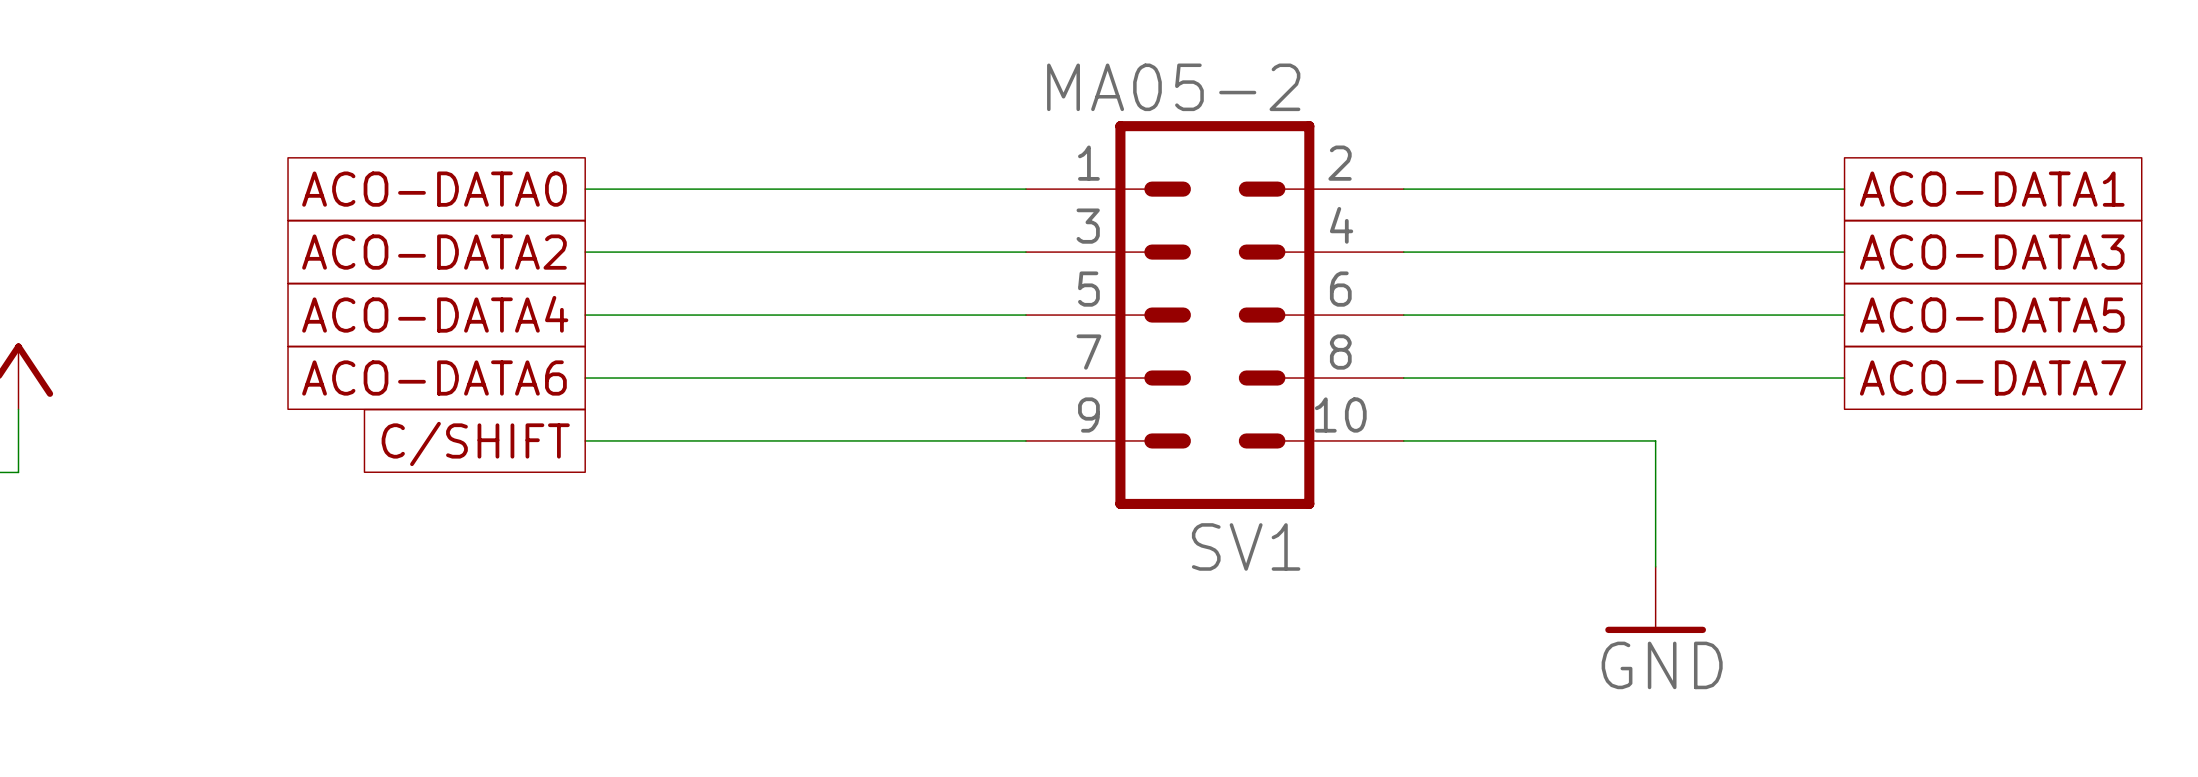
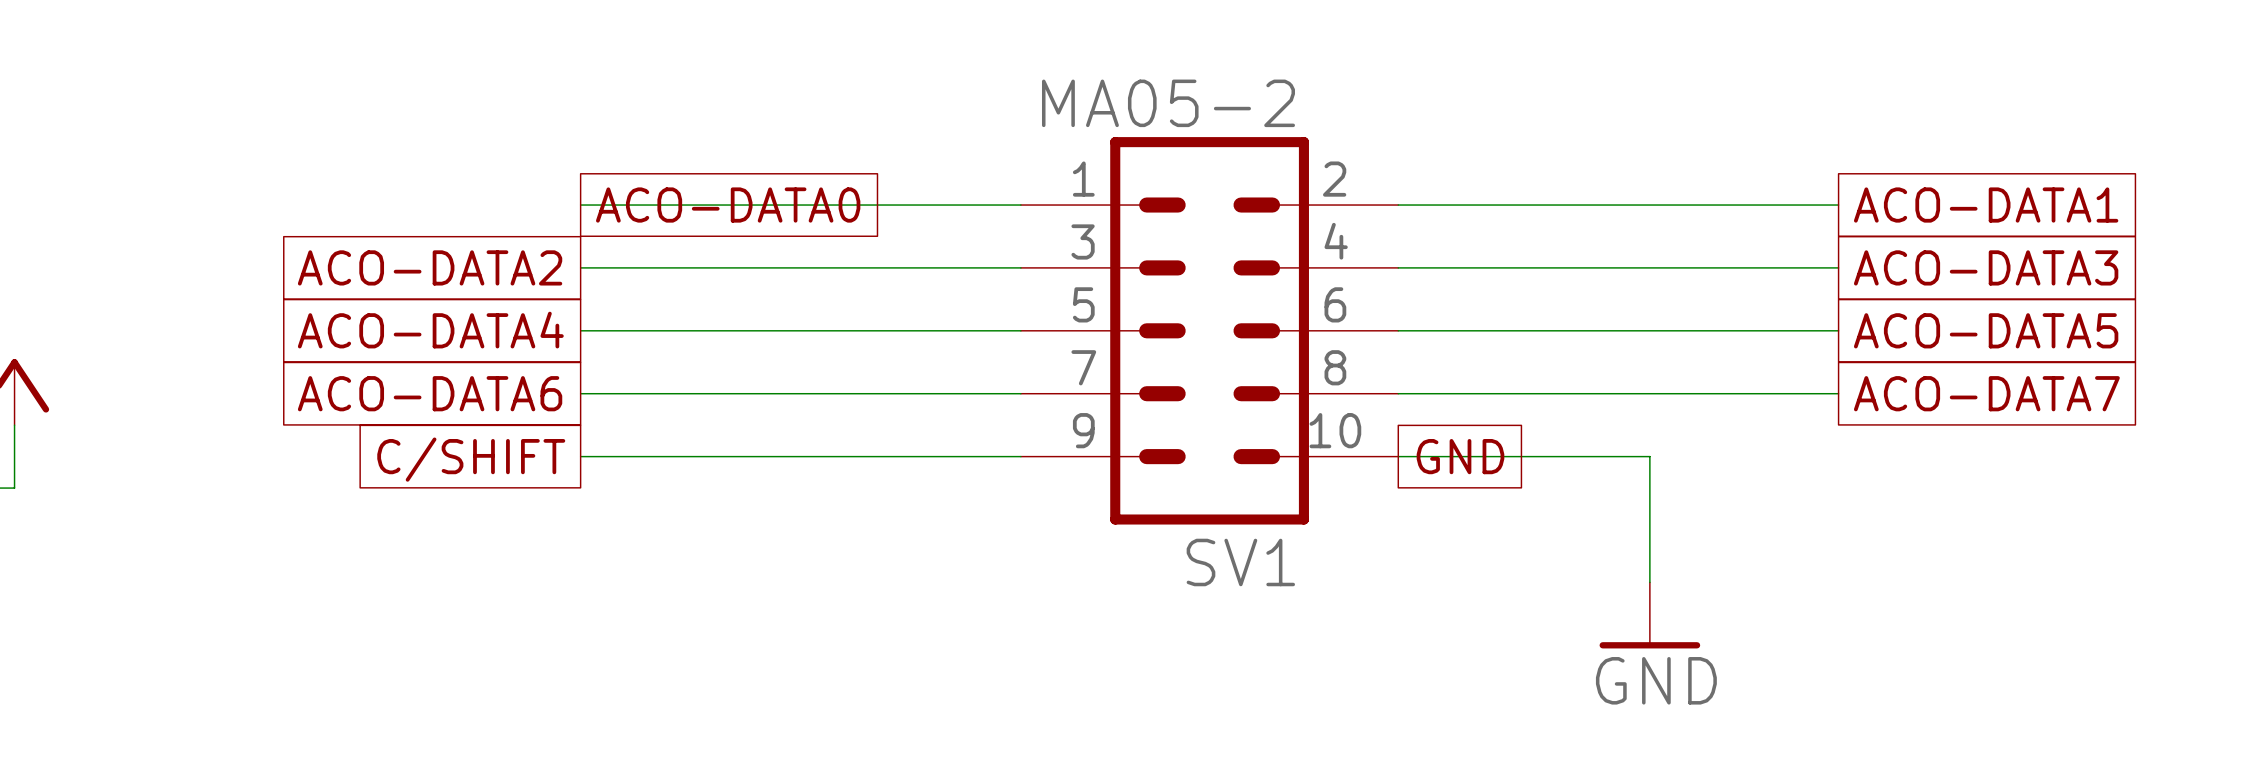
global label rotation: 0° (434, 189) -> 180° (728, 205)
global label position: ACO-DATA0 (434, 189) -> ACO-DATA0 (728, 205)
global label: none -> GND (1460, 456)

